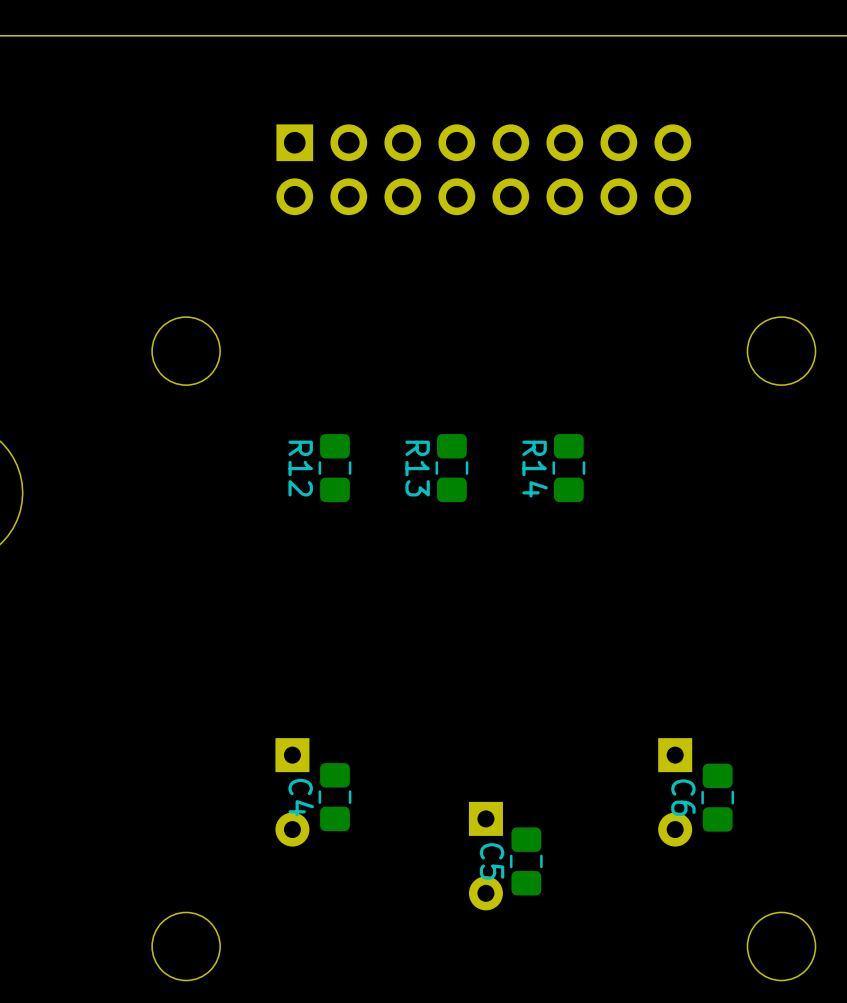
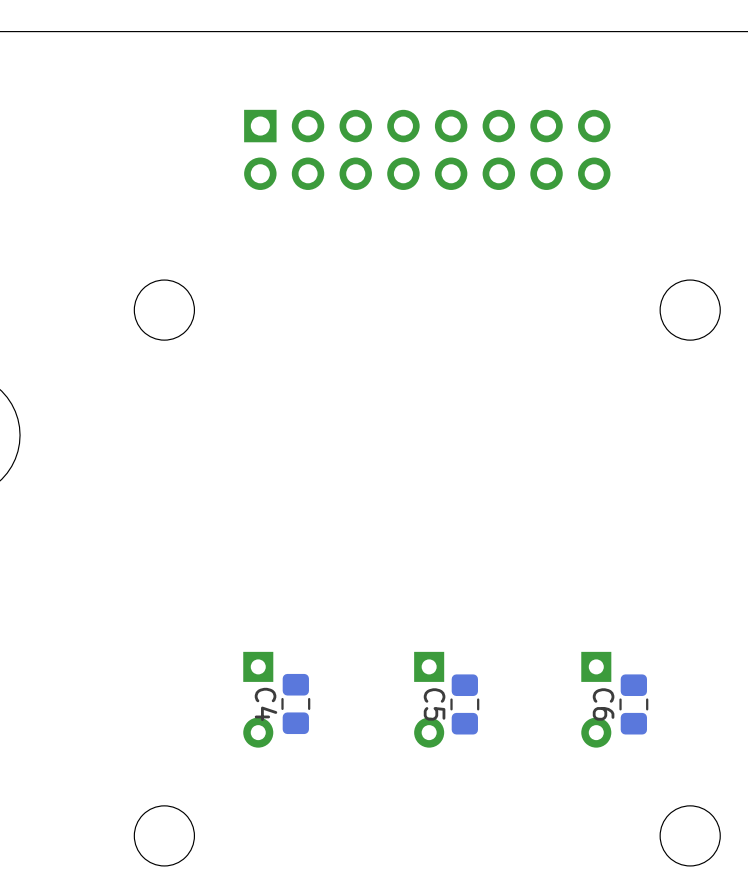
R12: (334, 468) -> none
R13: (451, 468) -> none
R14: (568, 468) -> none
part position: (485, 856) -> (429, 699)
C5 position: (526, 861) -> (464, 704)

